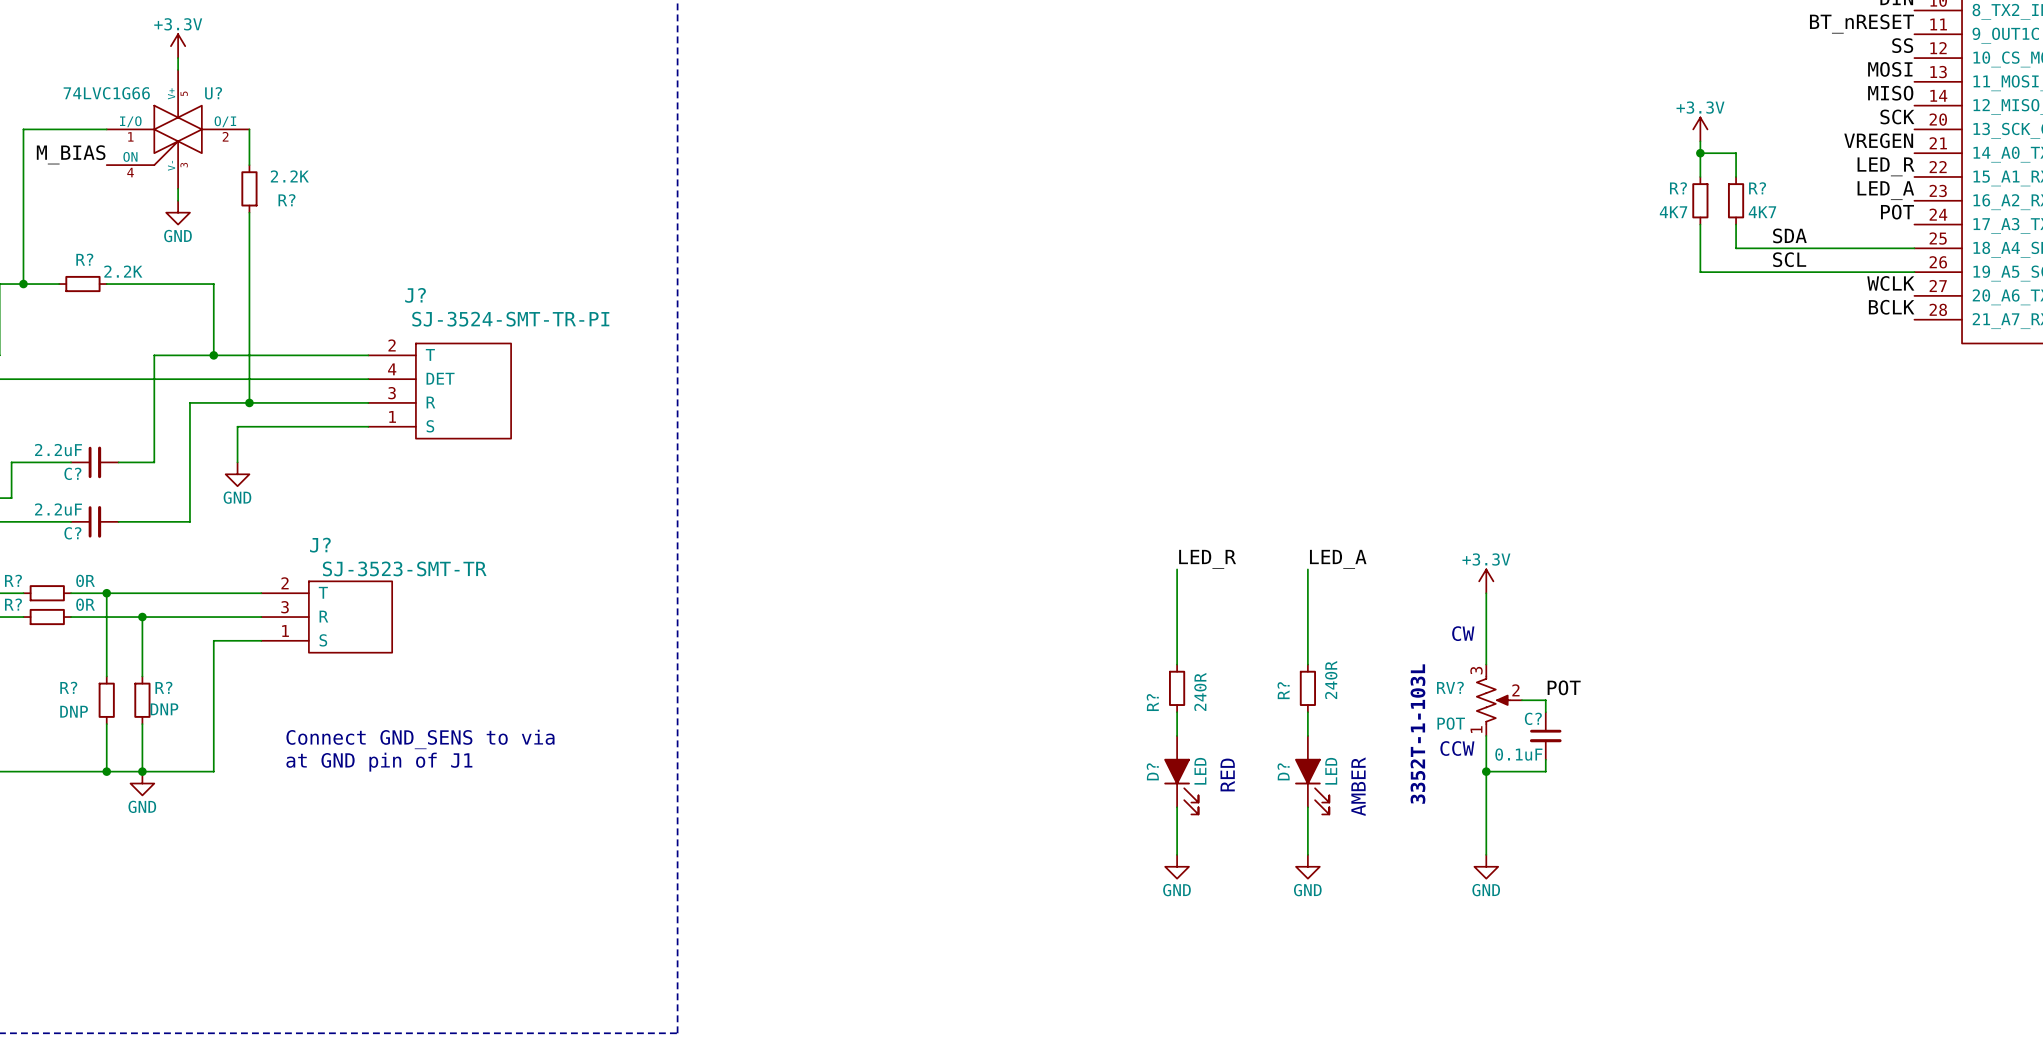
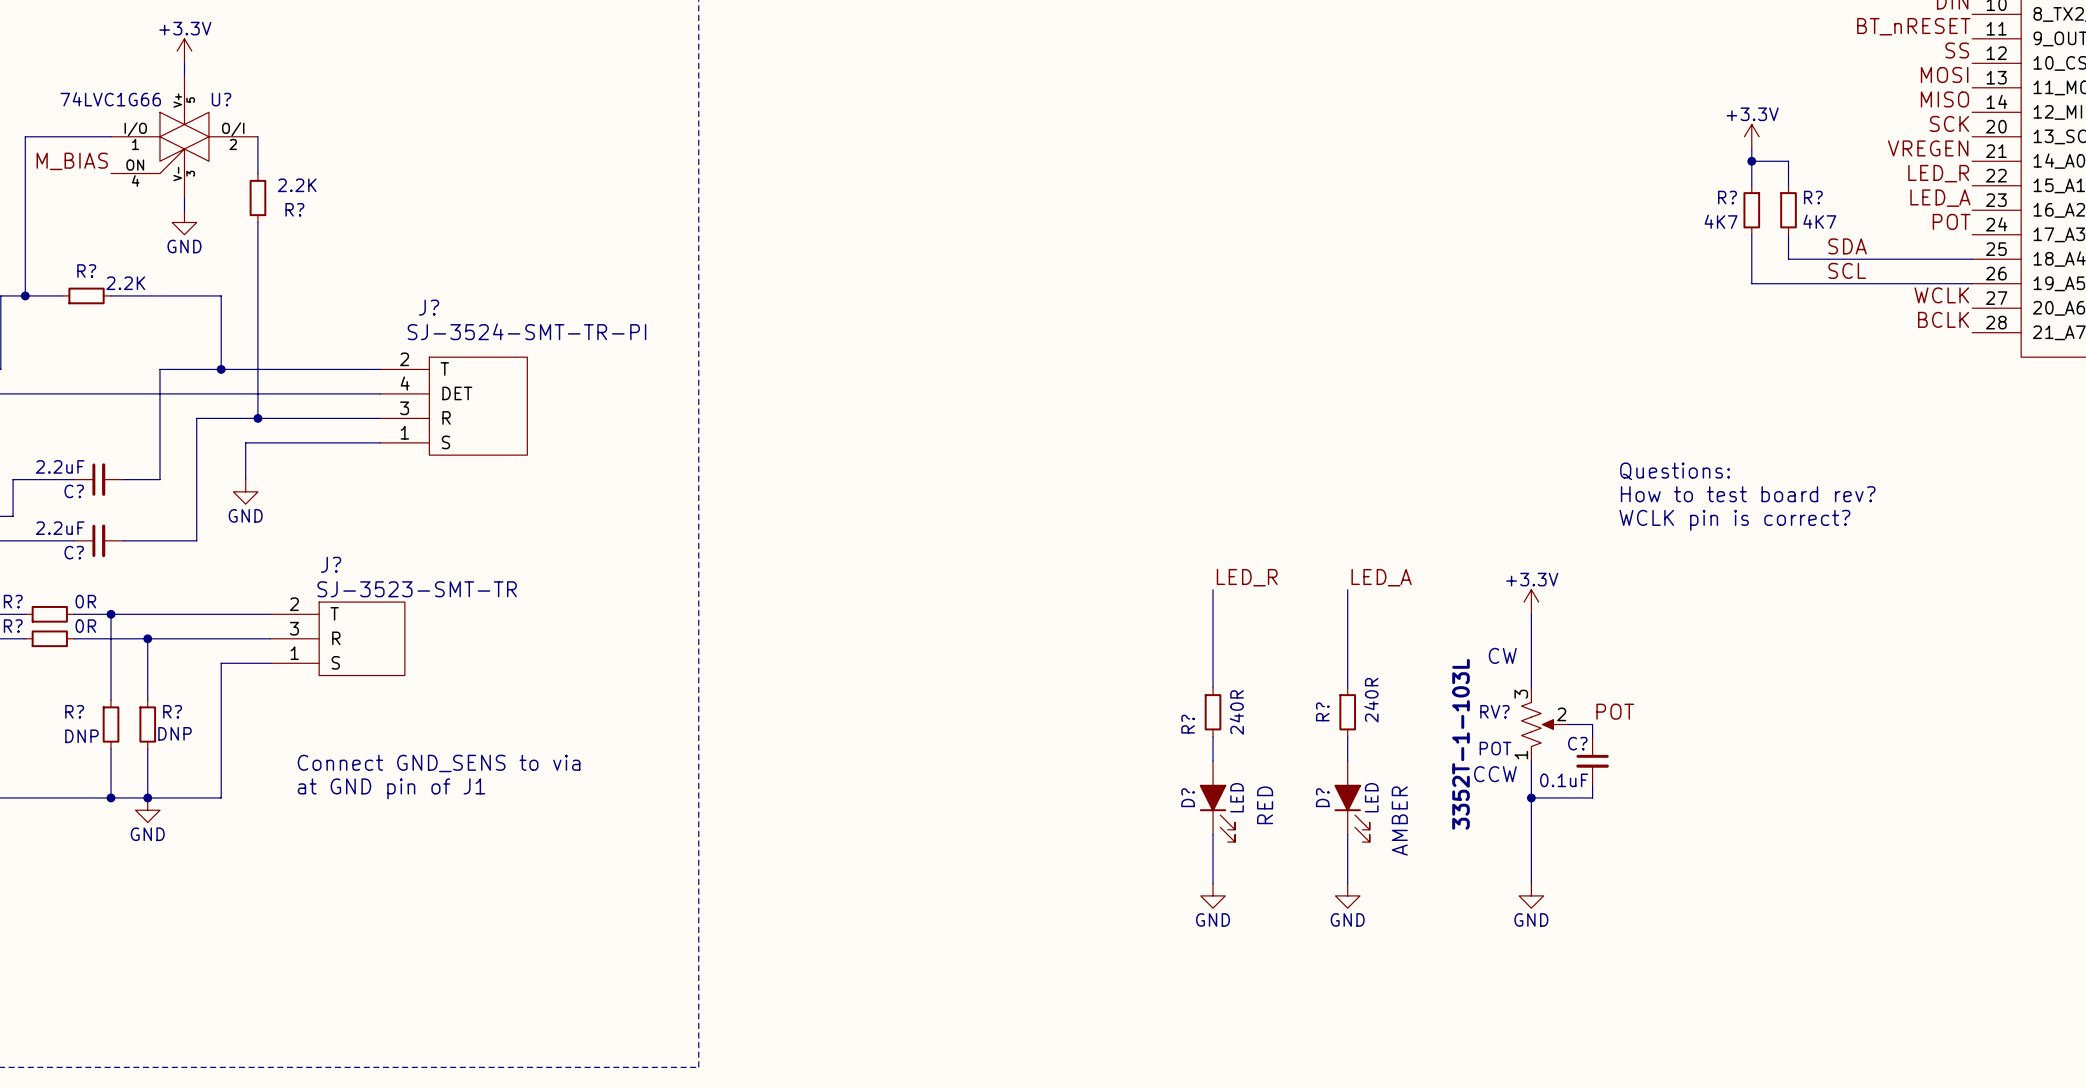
text: none -> Questions: (1675, 471)
text: none -> How to test board rev? (1748, 494)
text: none -> WCLK pin is correct? (1734, 520)

